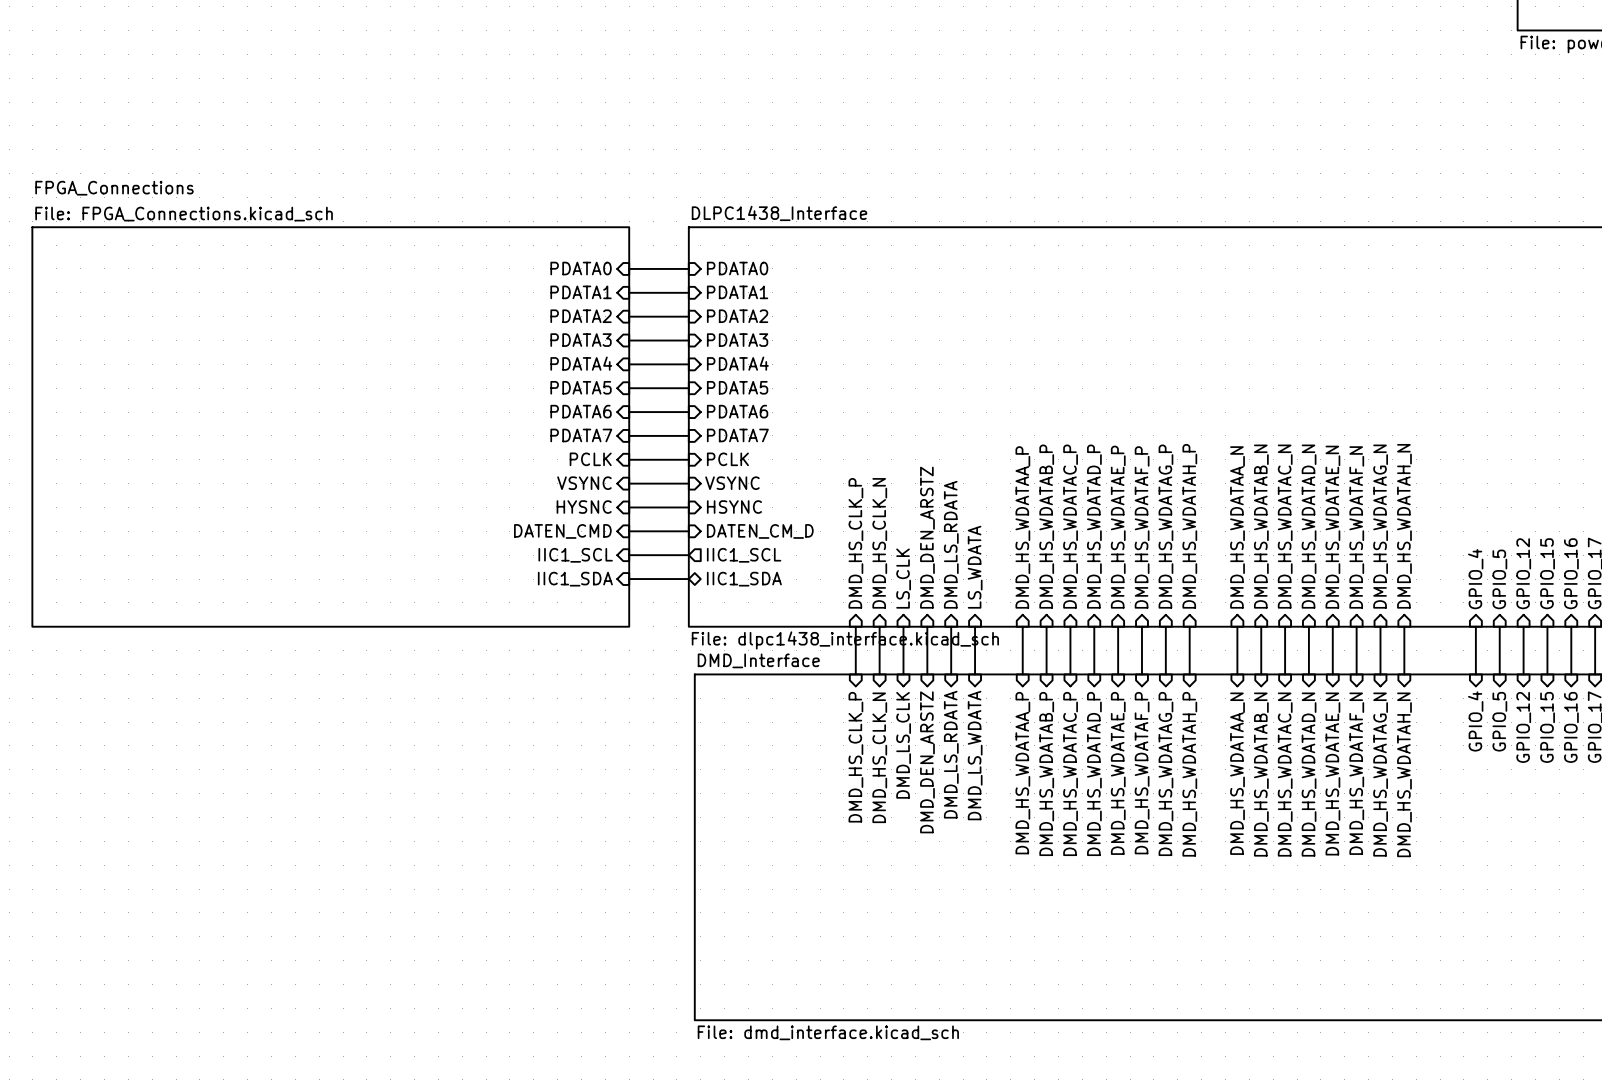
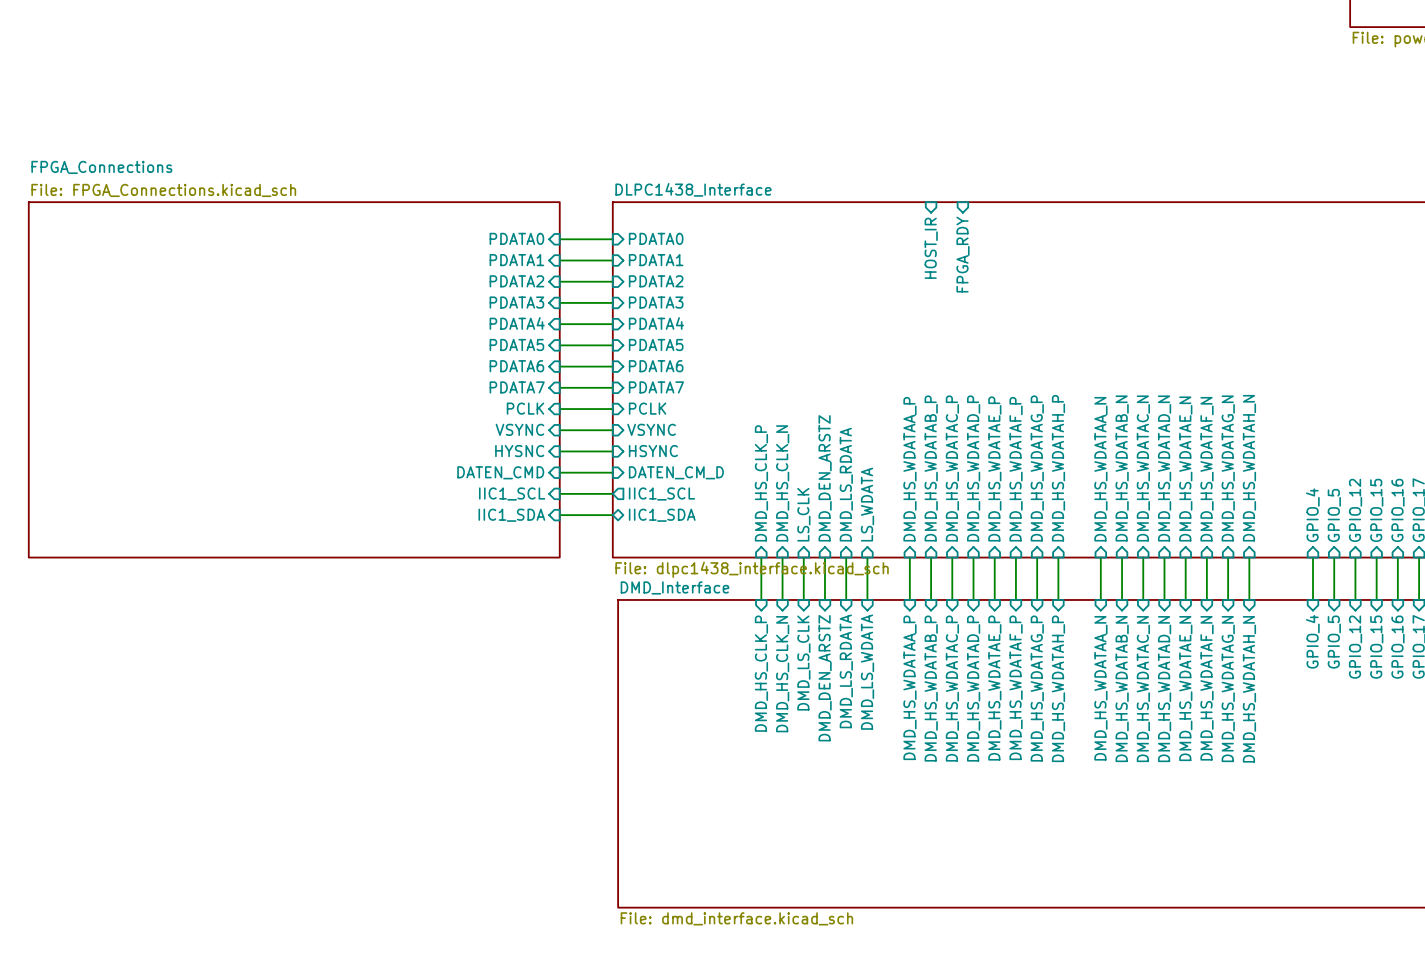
sheet pin: none -> HOST_IR (931, 248)
sheet pin: none -> FPGA_RDY (963, 254)

